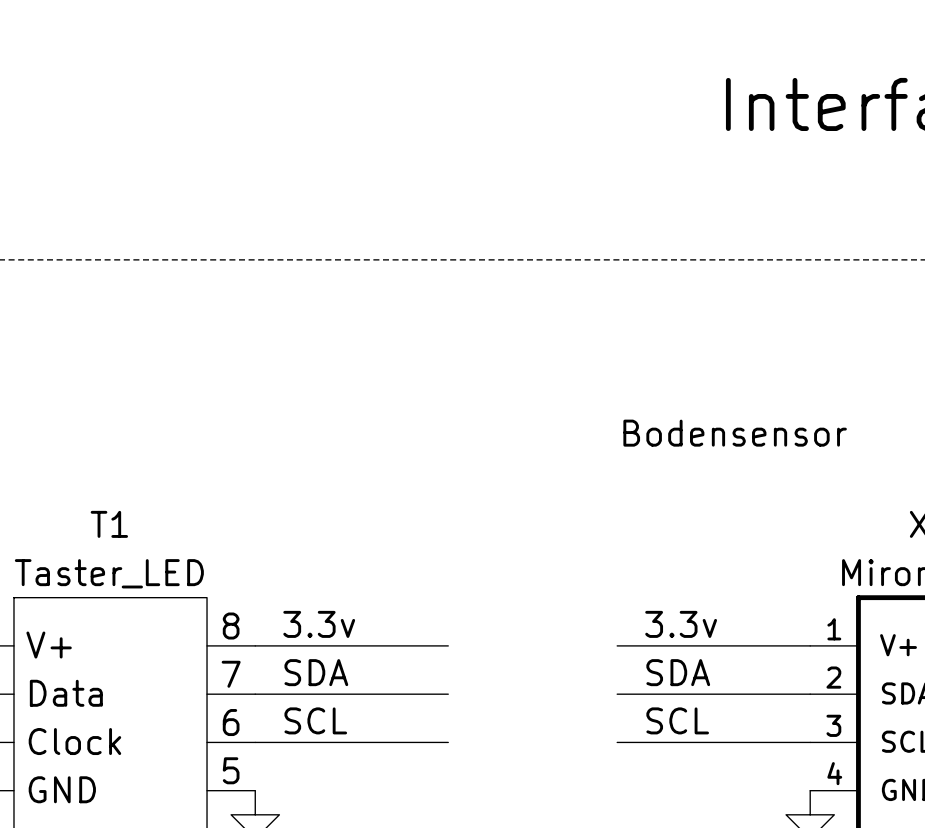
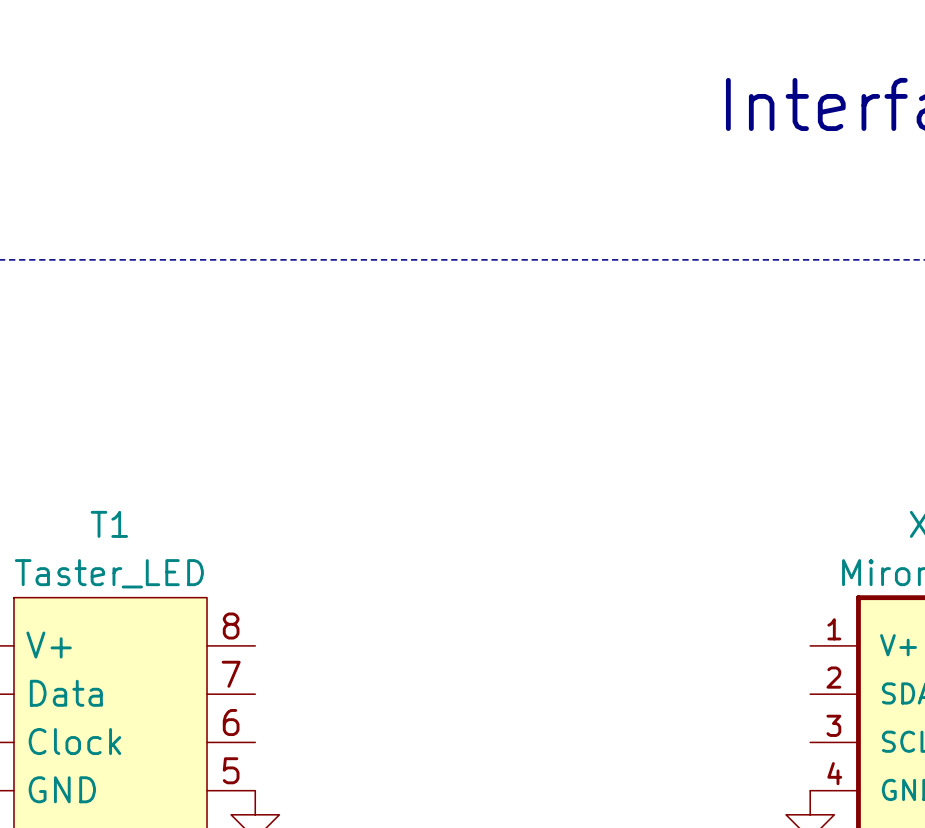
text: Bodensensor (735, 433) -> none
label: 3.3v (319, 624) -> none
label: 3.3v (681, 624) -> none
wire: (255, 645) (448, 645) -> none
wire: (617, 645) (810, 645) -> none
label: SDA (316, 672) -> none
label: SDA (678, 672) -> none
wire: (255, 694) (448, 694) -> none
wire: (617, 694) (810, 694) -> none
label: SCL (315, 720) -> none
label: SCL (677, 720) -> none
wire: (255, 742) (448, 742) -> none
wire: (617, 742) (810, 742) -> none

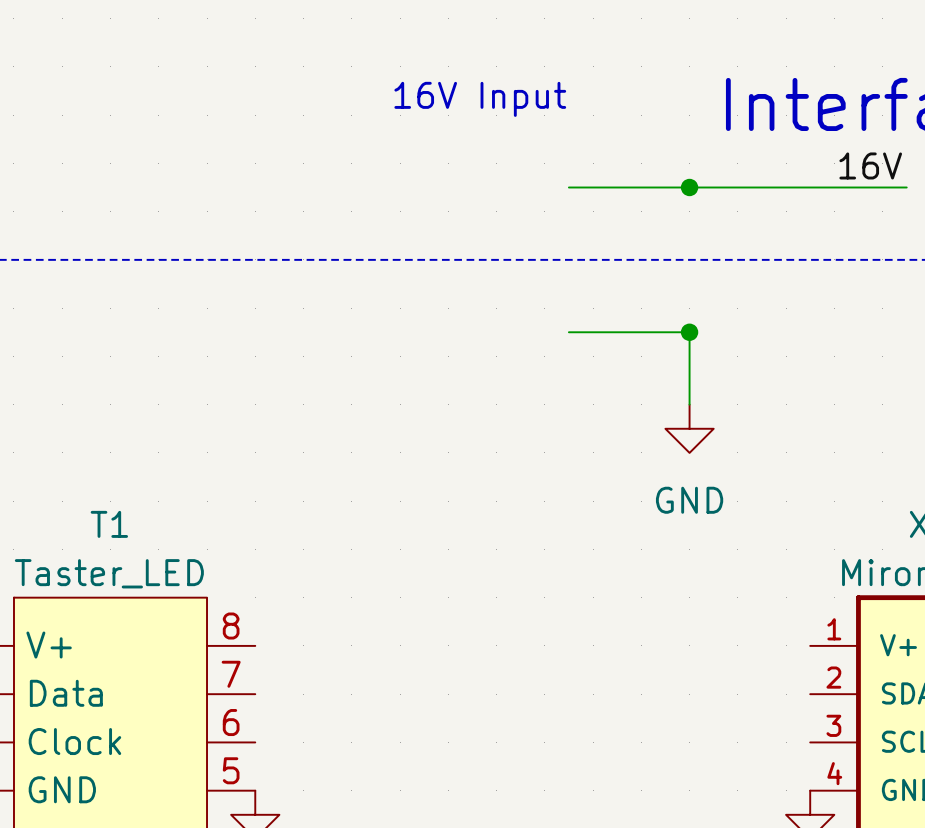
text: none -> 16V Input (480, 99)
label: none -> 16V (870, 165)
wire: none -> (568, 187) (906, 187)
junction: none -> (689, 187)
wire: none -> (568, 332) (689, 332) (689, 404)
junction: none -> (689, 332)
power symbol: none -> GND (689, 428)

